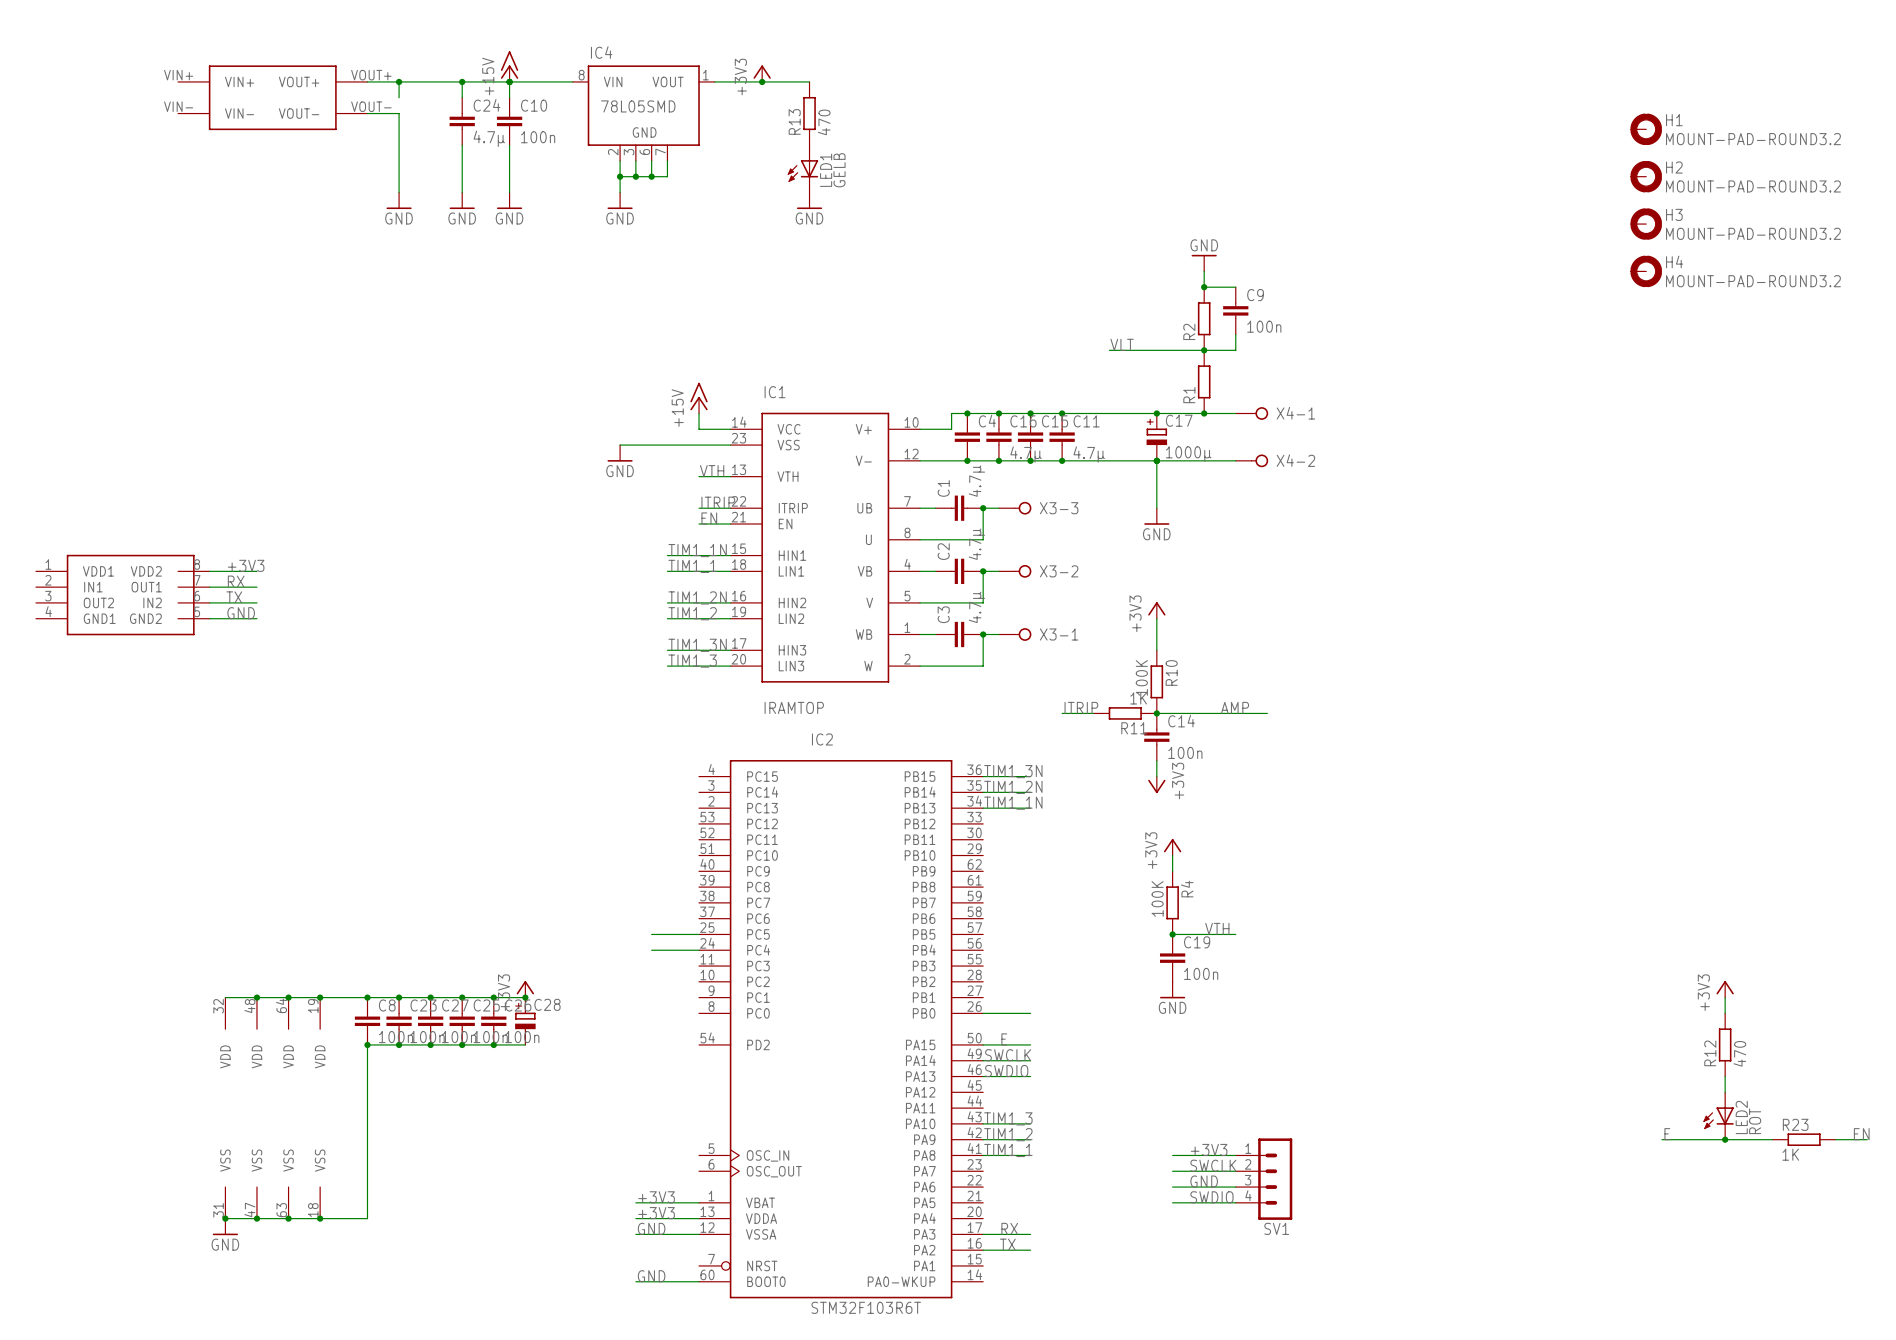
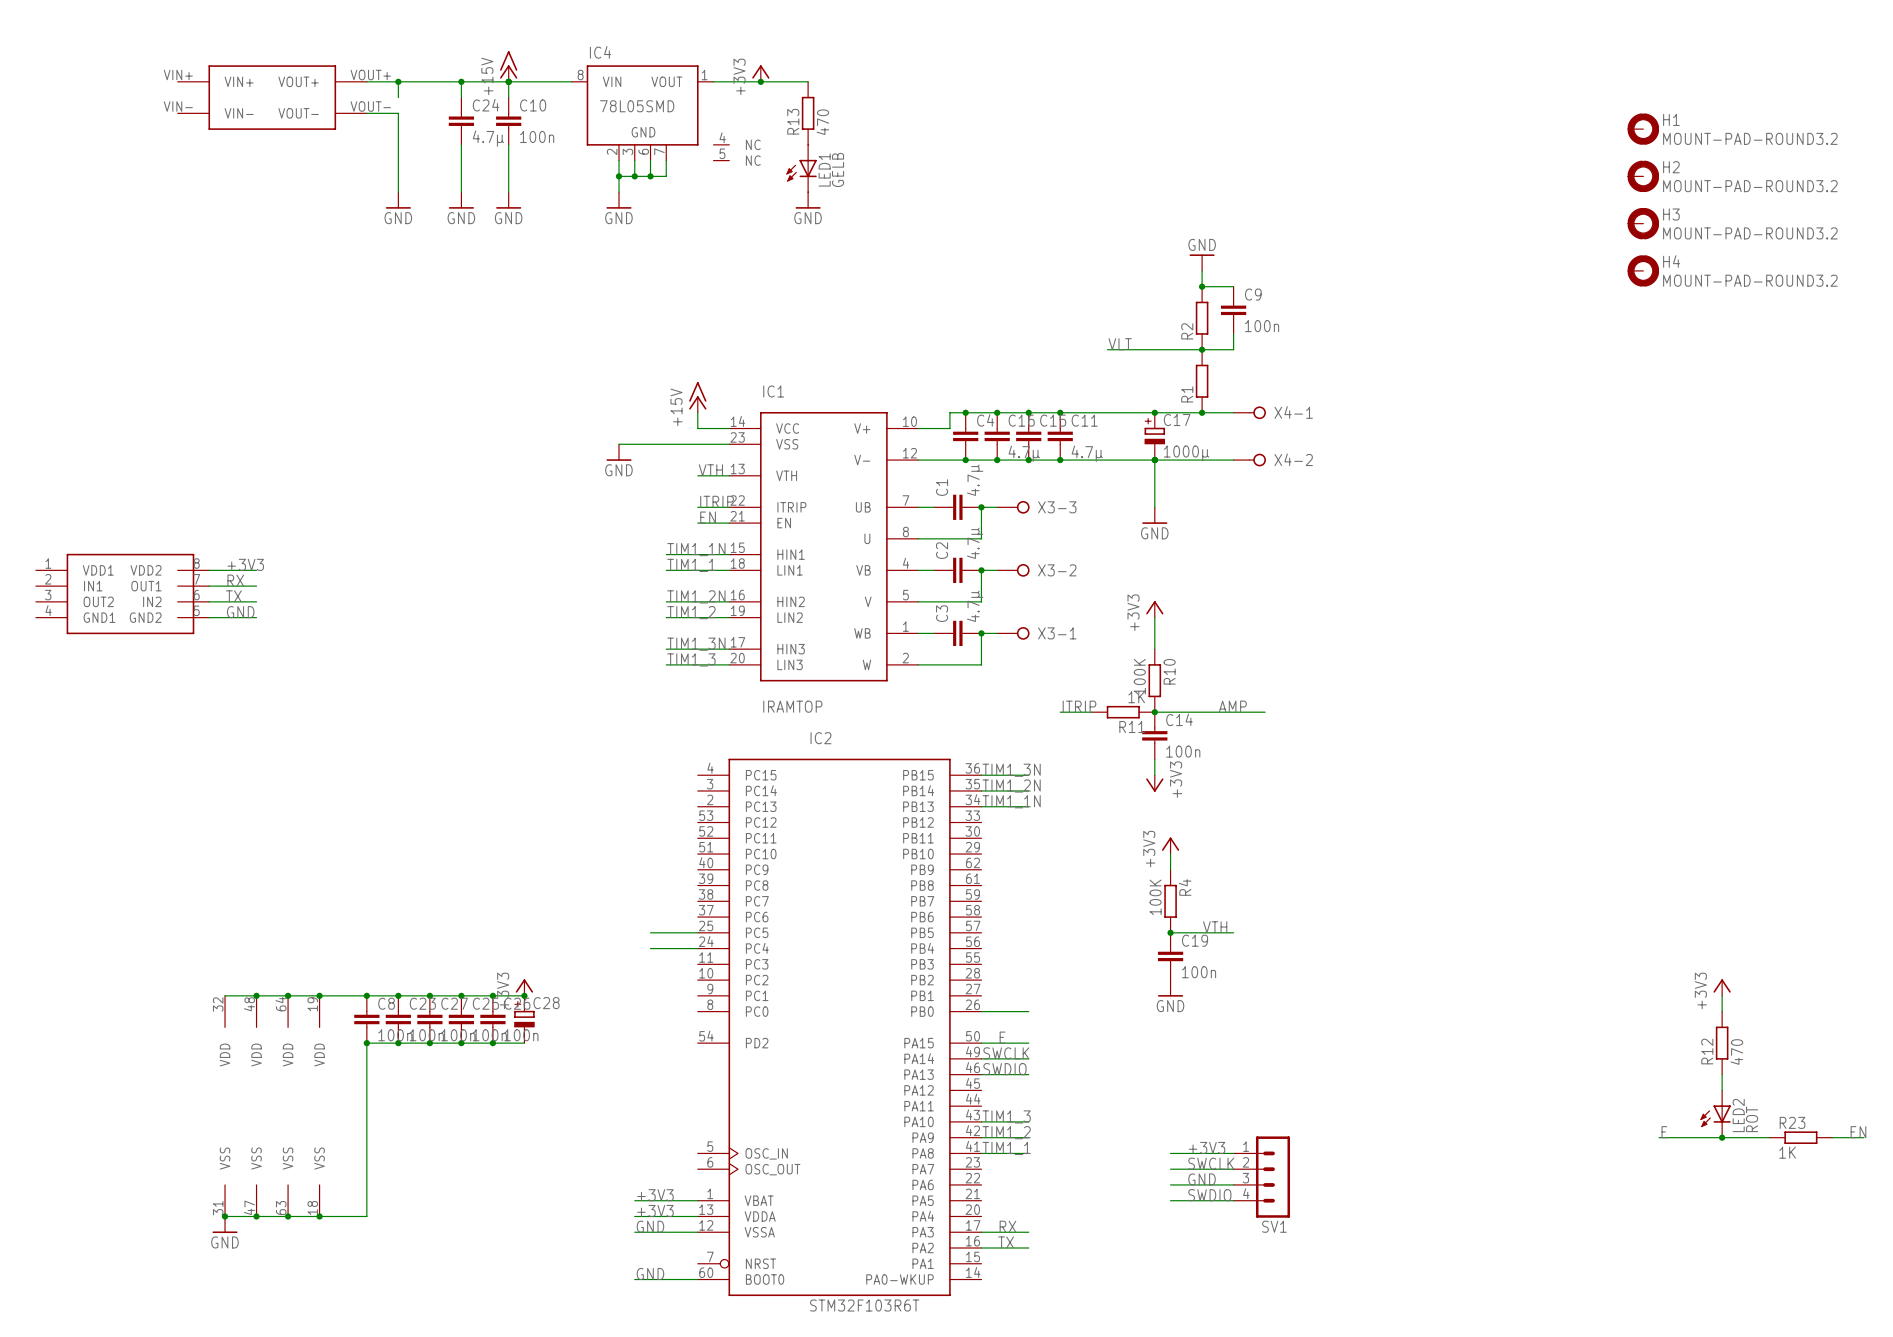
part: none -> (721, 144)
part: none -> (721, 160)

